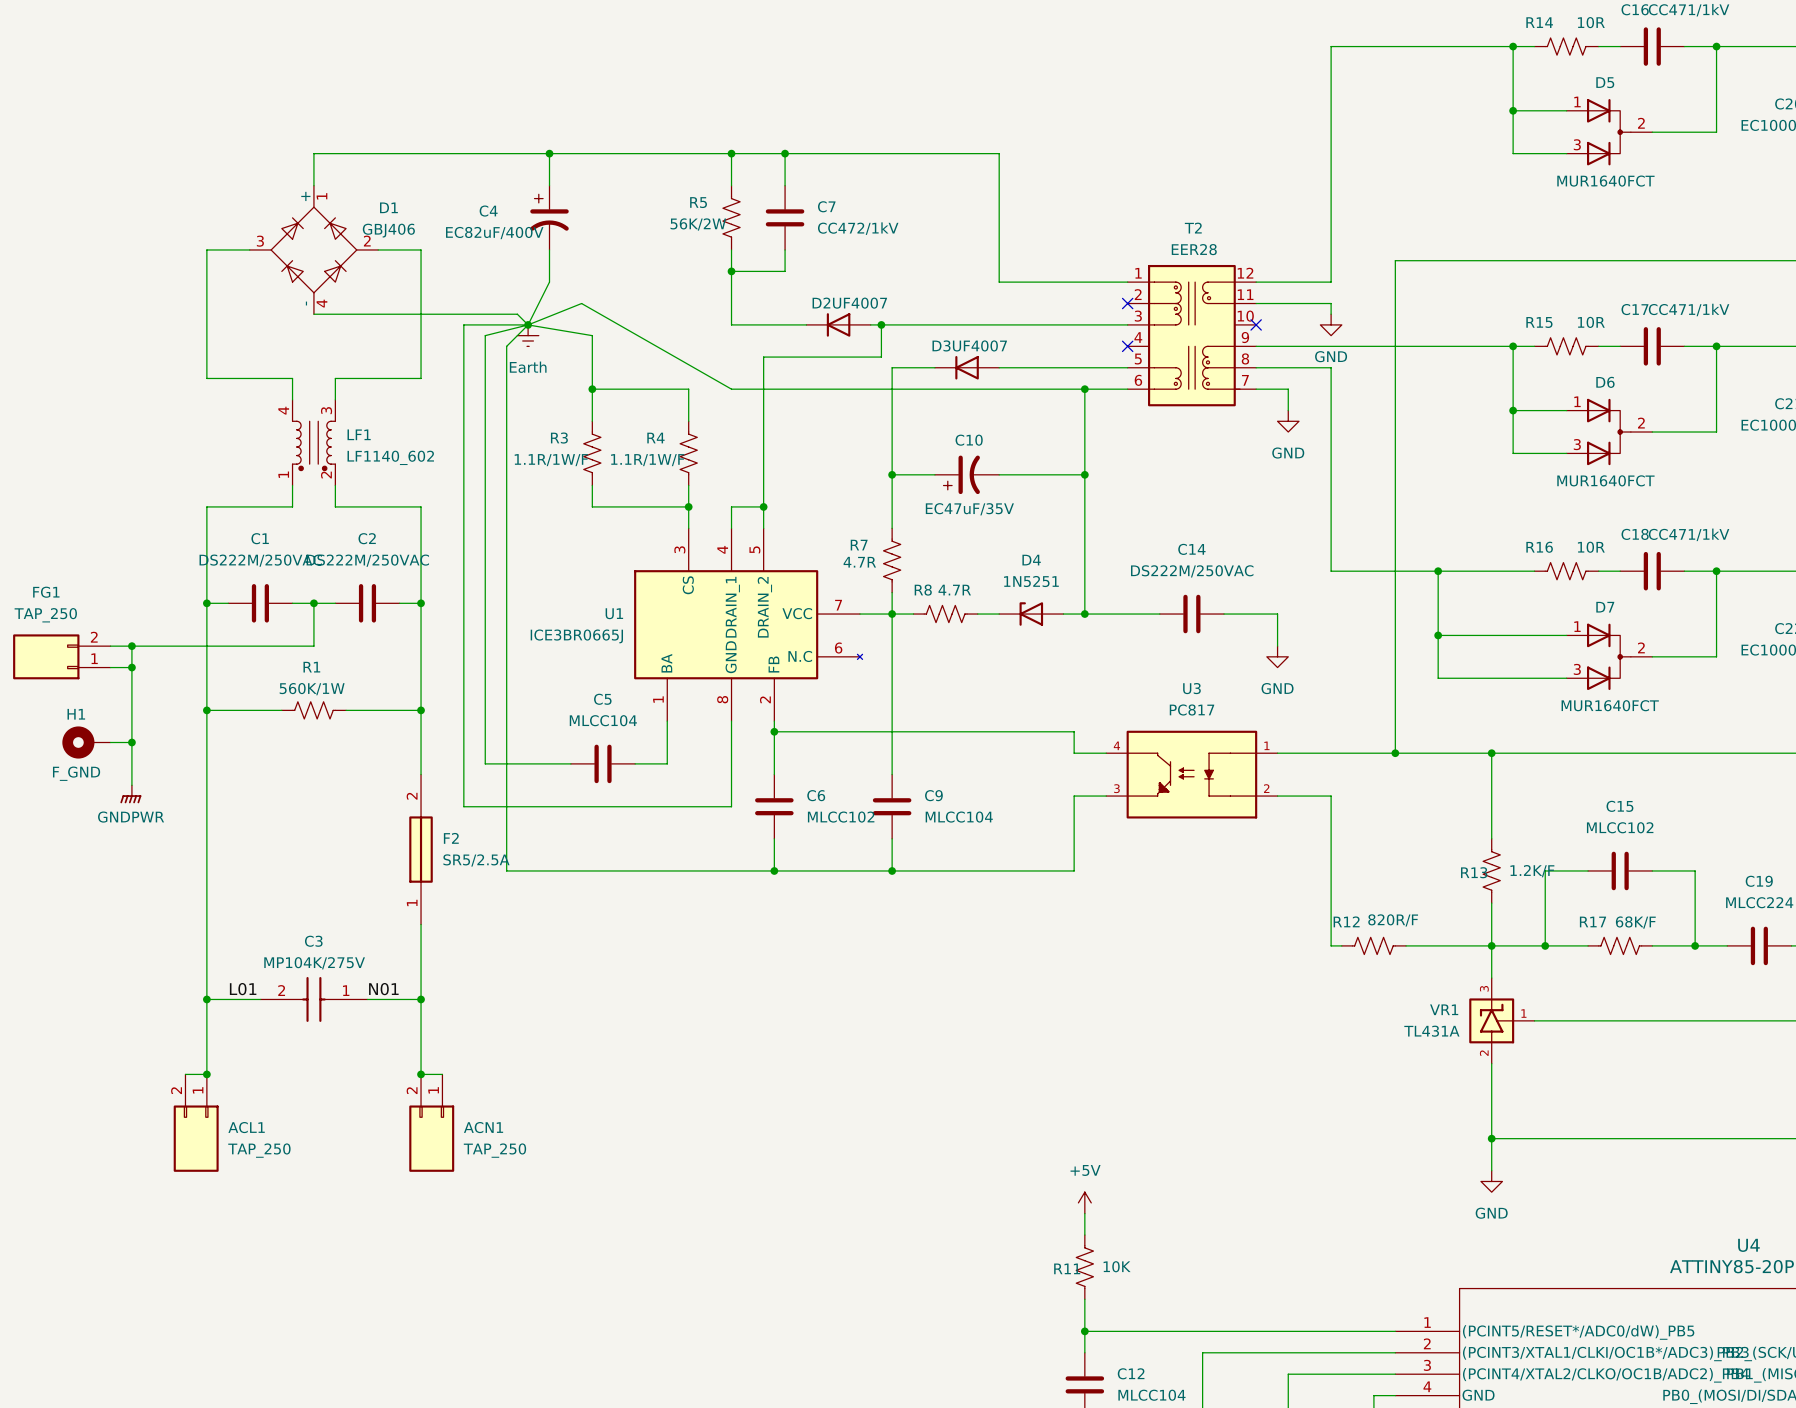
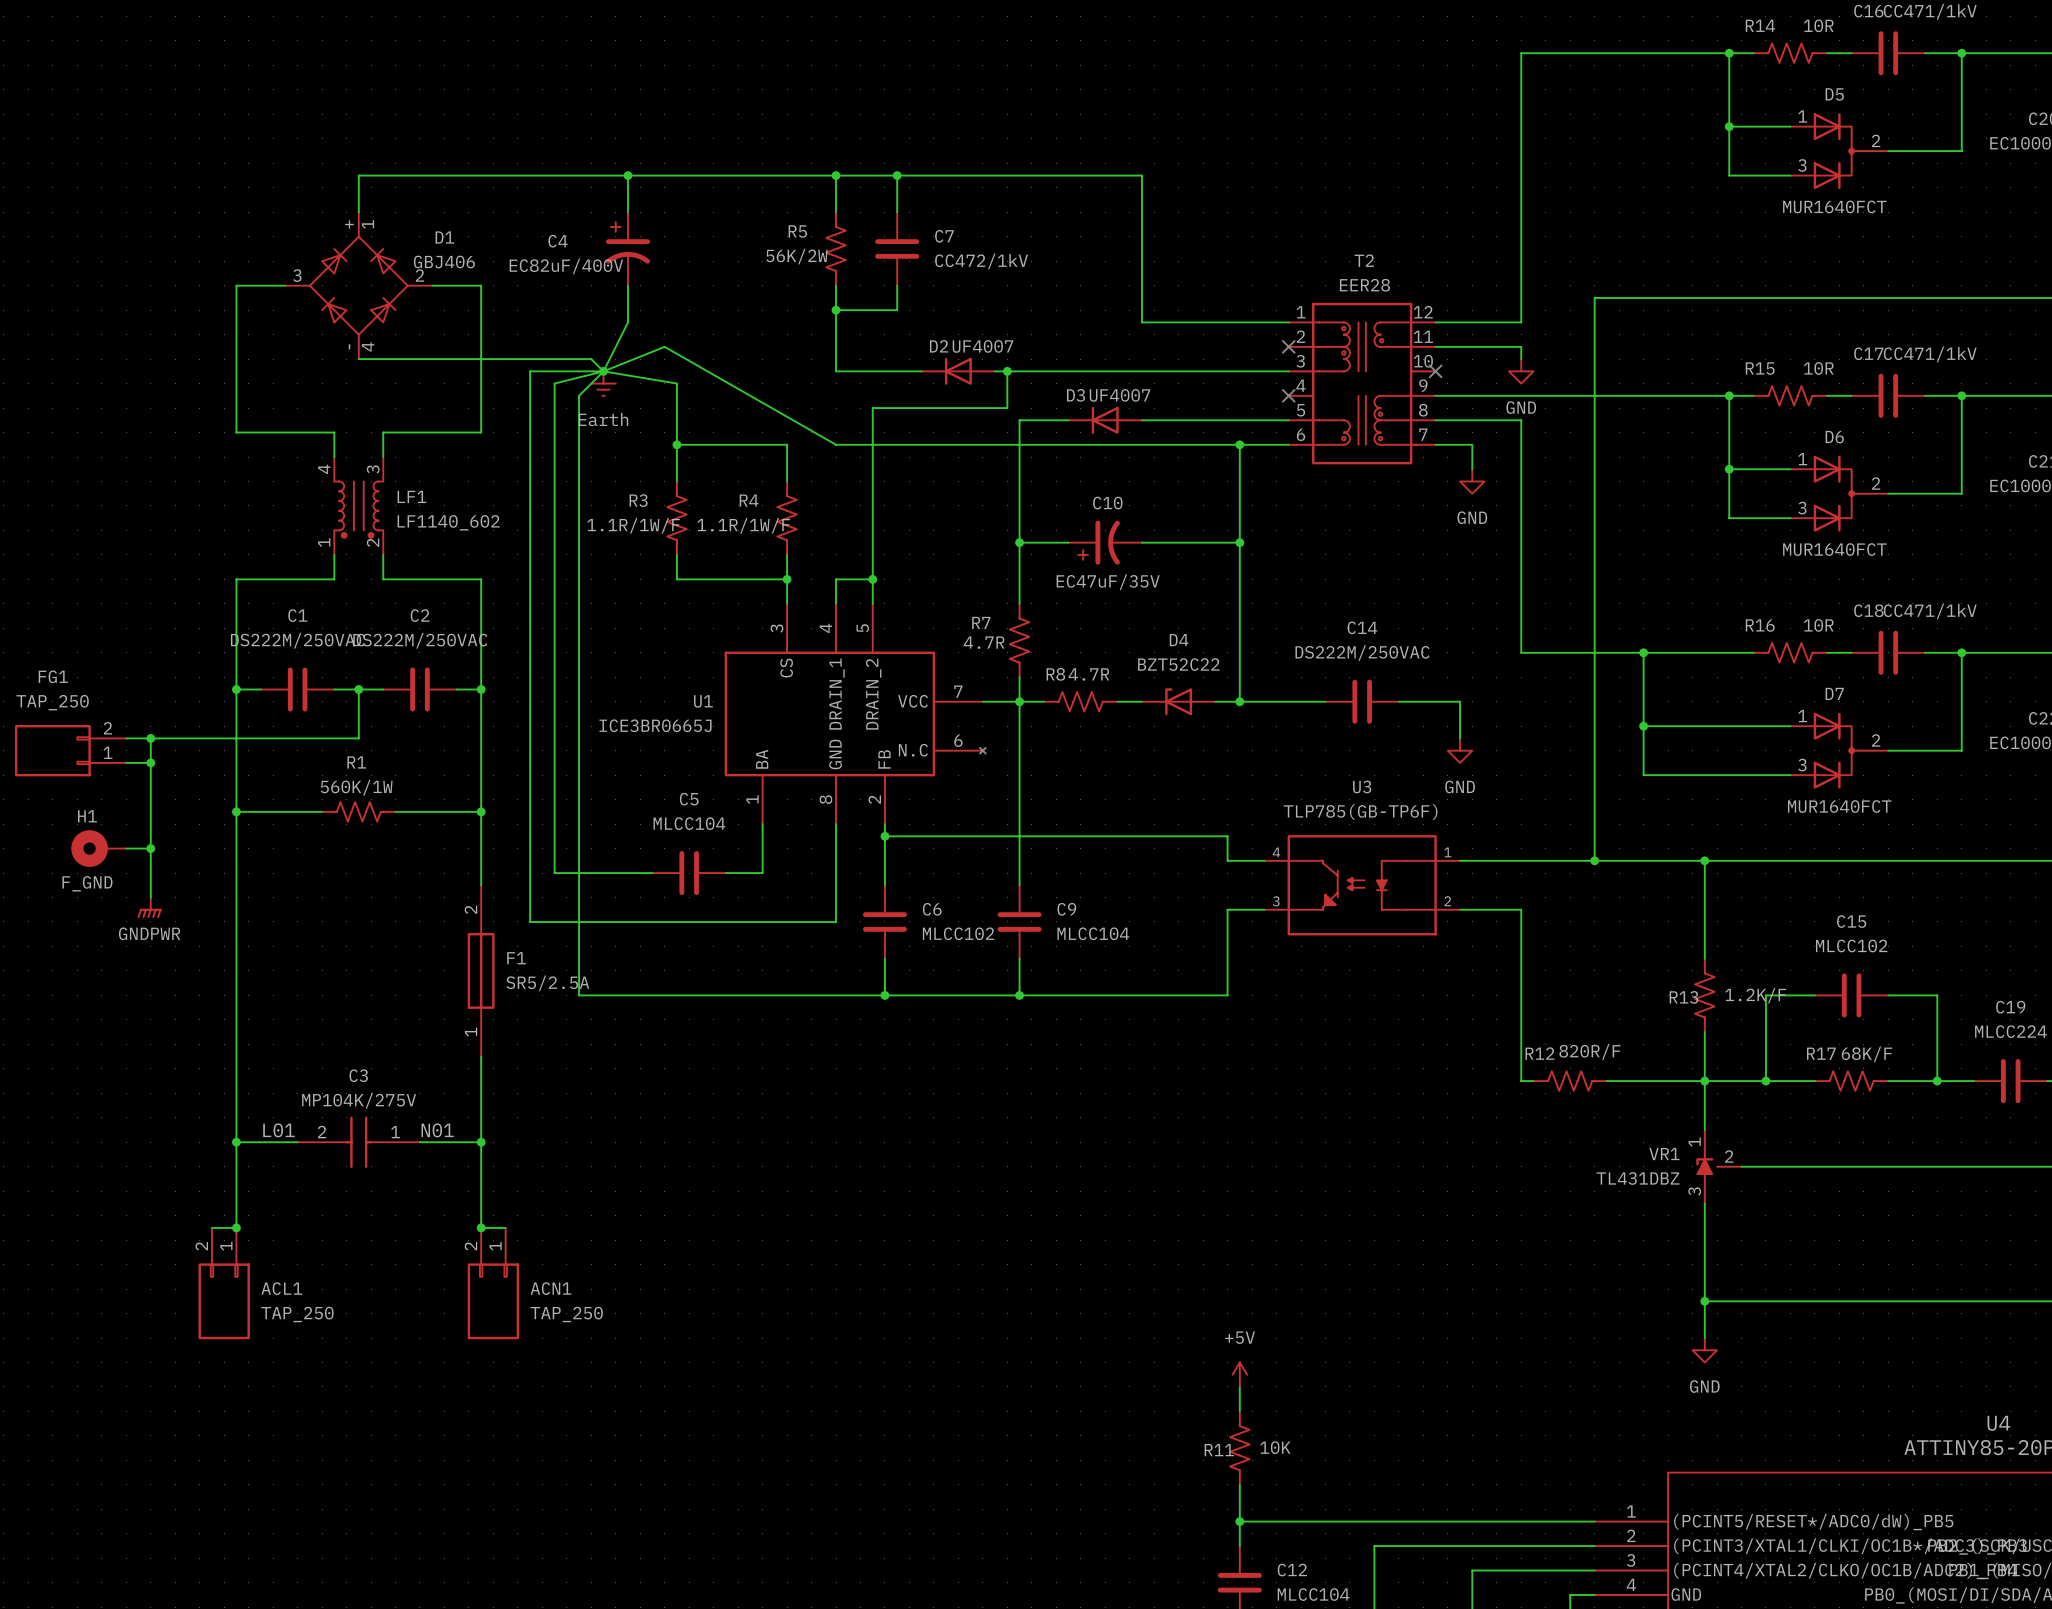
D4 value: 1N5251 (1031, 581) -> BZT52C22 (1178, 664)
U3 value: PC817 (1192, 709) -> TLP785(GB-TP6F) (1360, 812)
F2 name: F2 (451, 838) -> F1 (516, 958)
VR1 symbol: [1469, 978, 1535, 1064] -> [1696, 1130, 1742, 1204]
VR1 value: TL431A (1431, 1031) -> TL431DBZ (1638, 1178)

